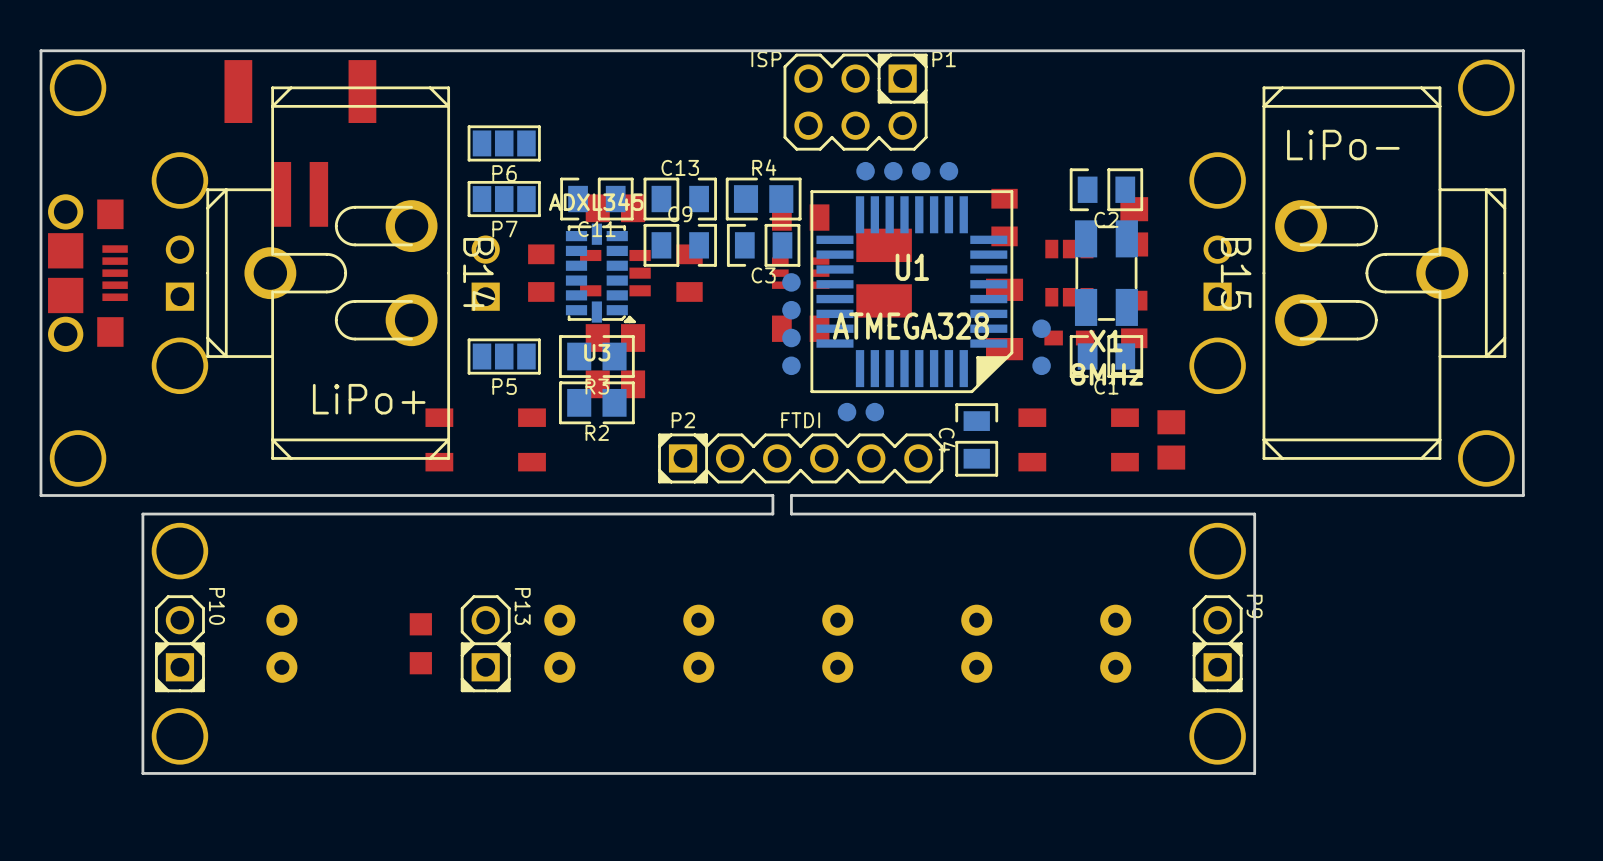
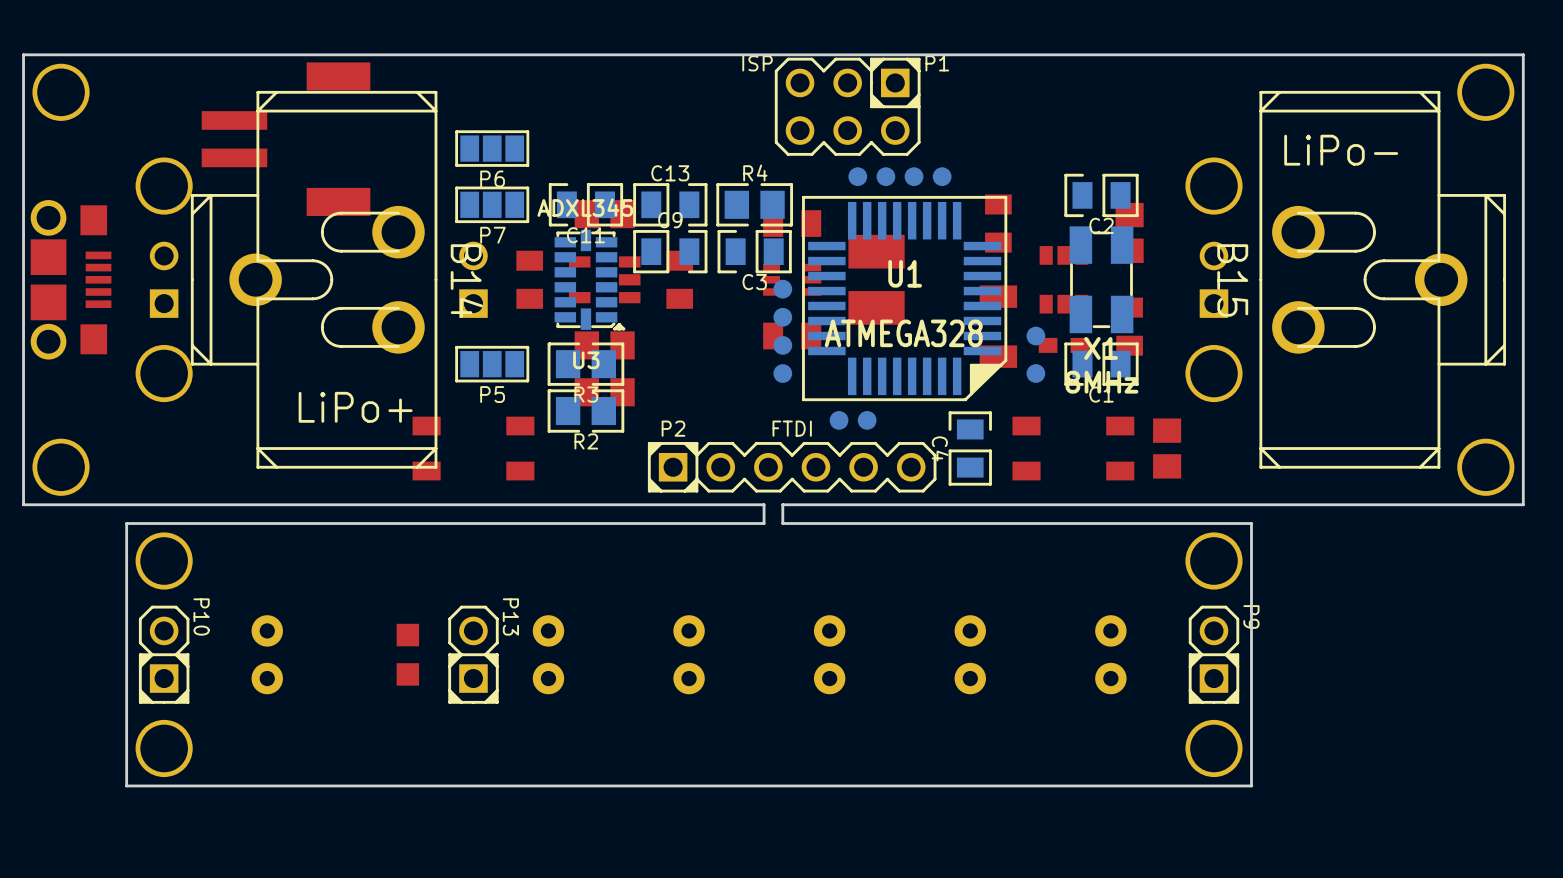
part rotation: 0° (300, 143) -> 90° clockwise (286, 139)

